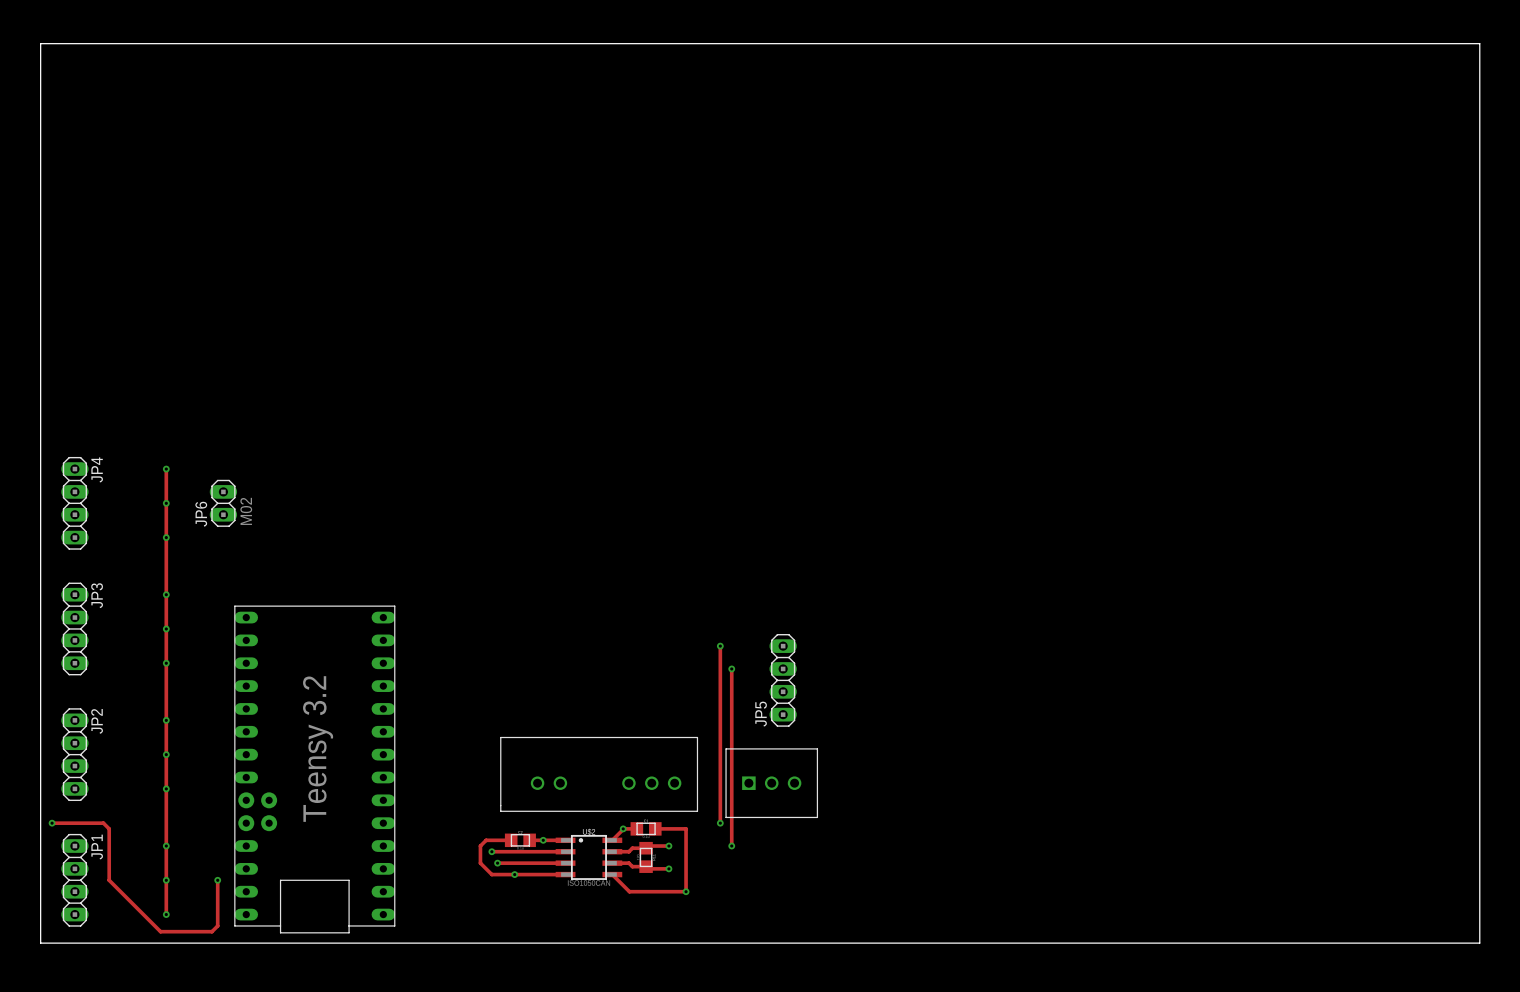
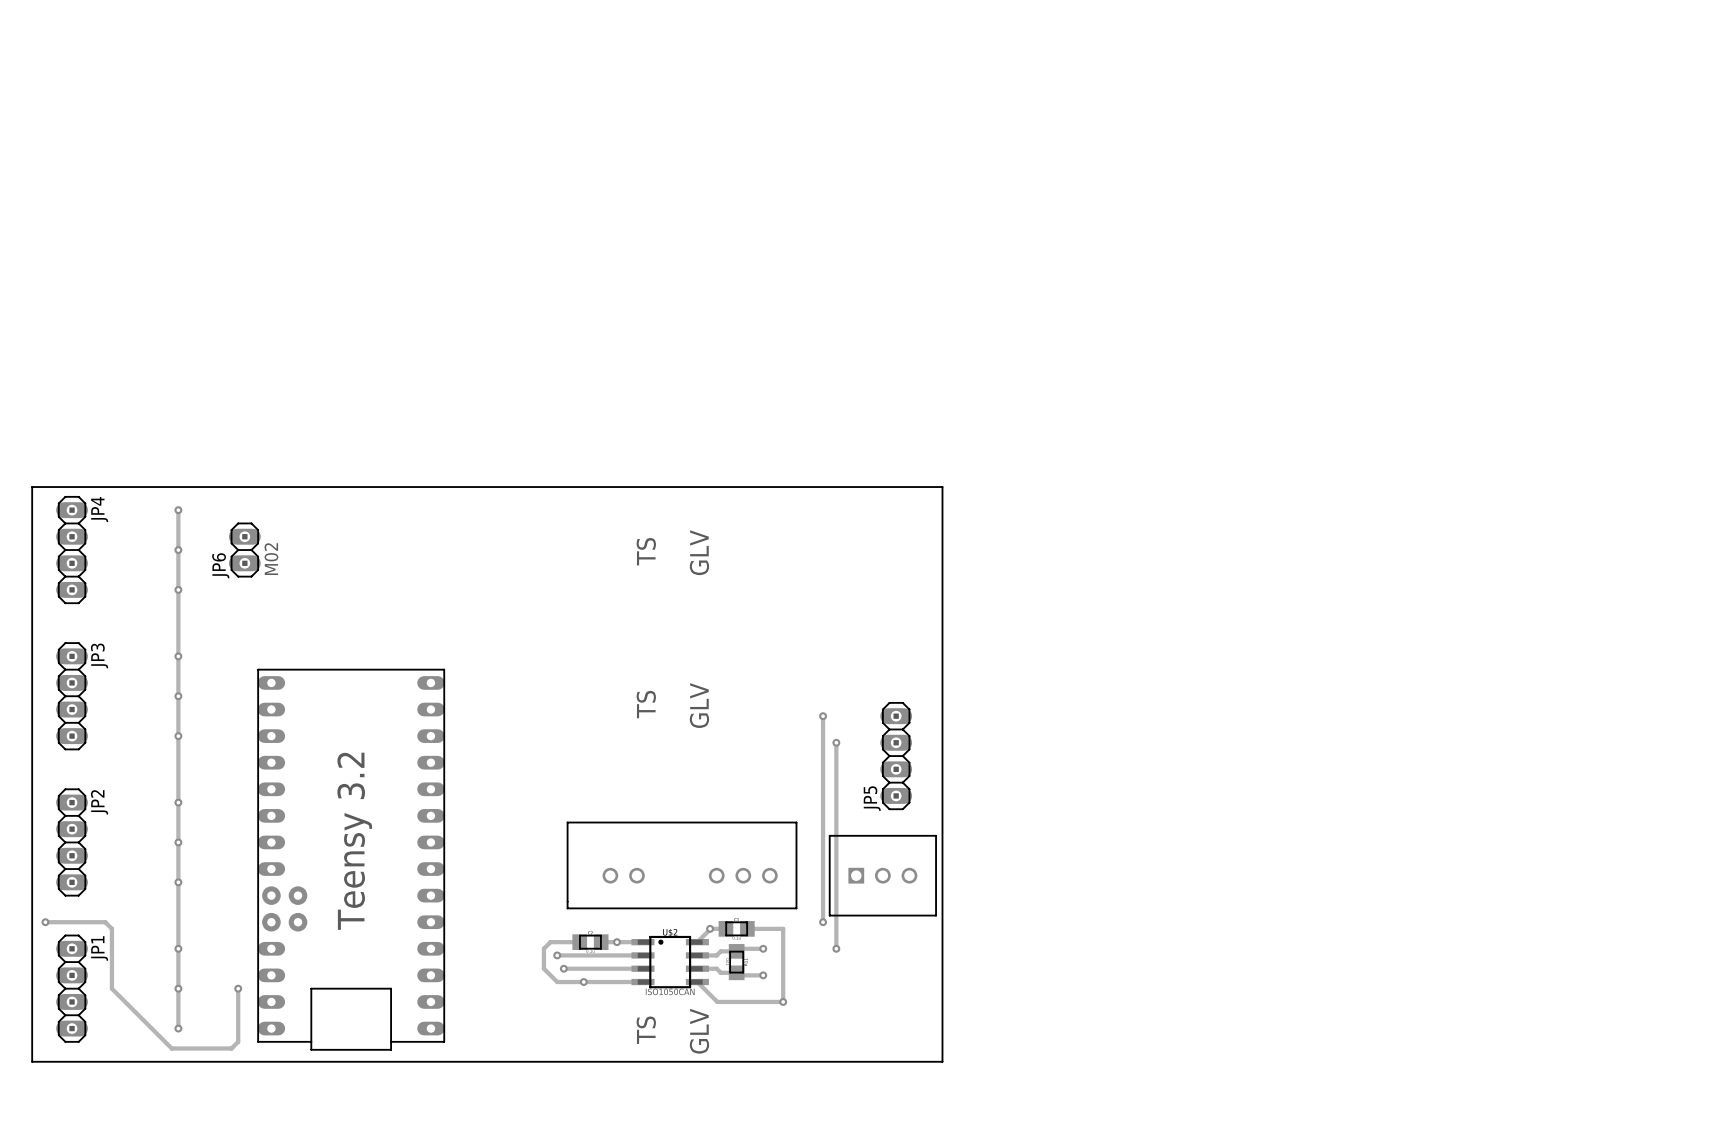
board edge: (40, 449) (40, 43) (1479, 43) (1479, 943) (822, 943) -> (32, 487) (942, 487) (942, 1061)
text: none -> TS (646, 551)
text: none -> GLV (699, 552)
text: none -> TS (646, 704)
text: none -> GLV (699, 705)
text: none -> TS (646, 1030)
text: none -> GLV (699, 1031)

